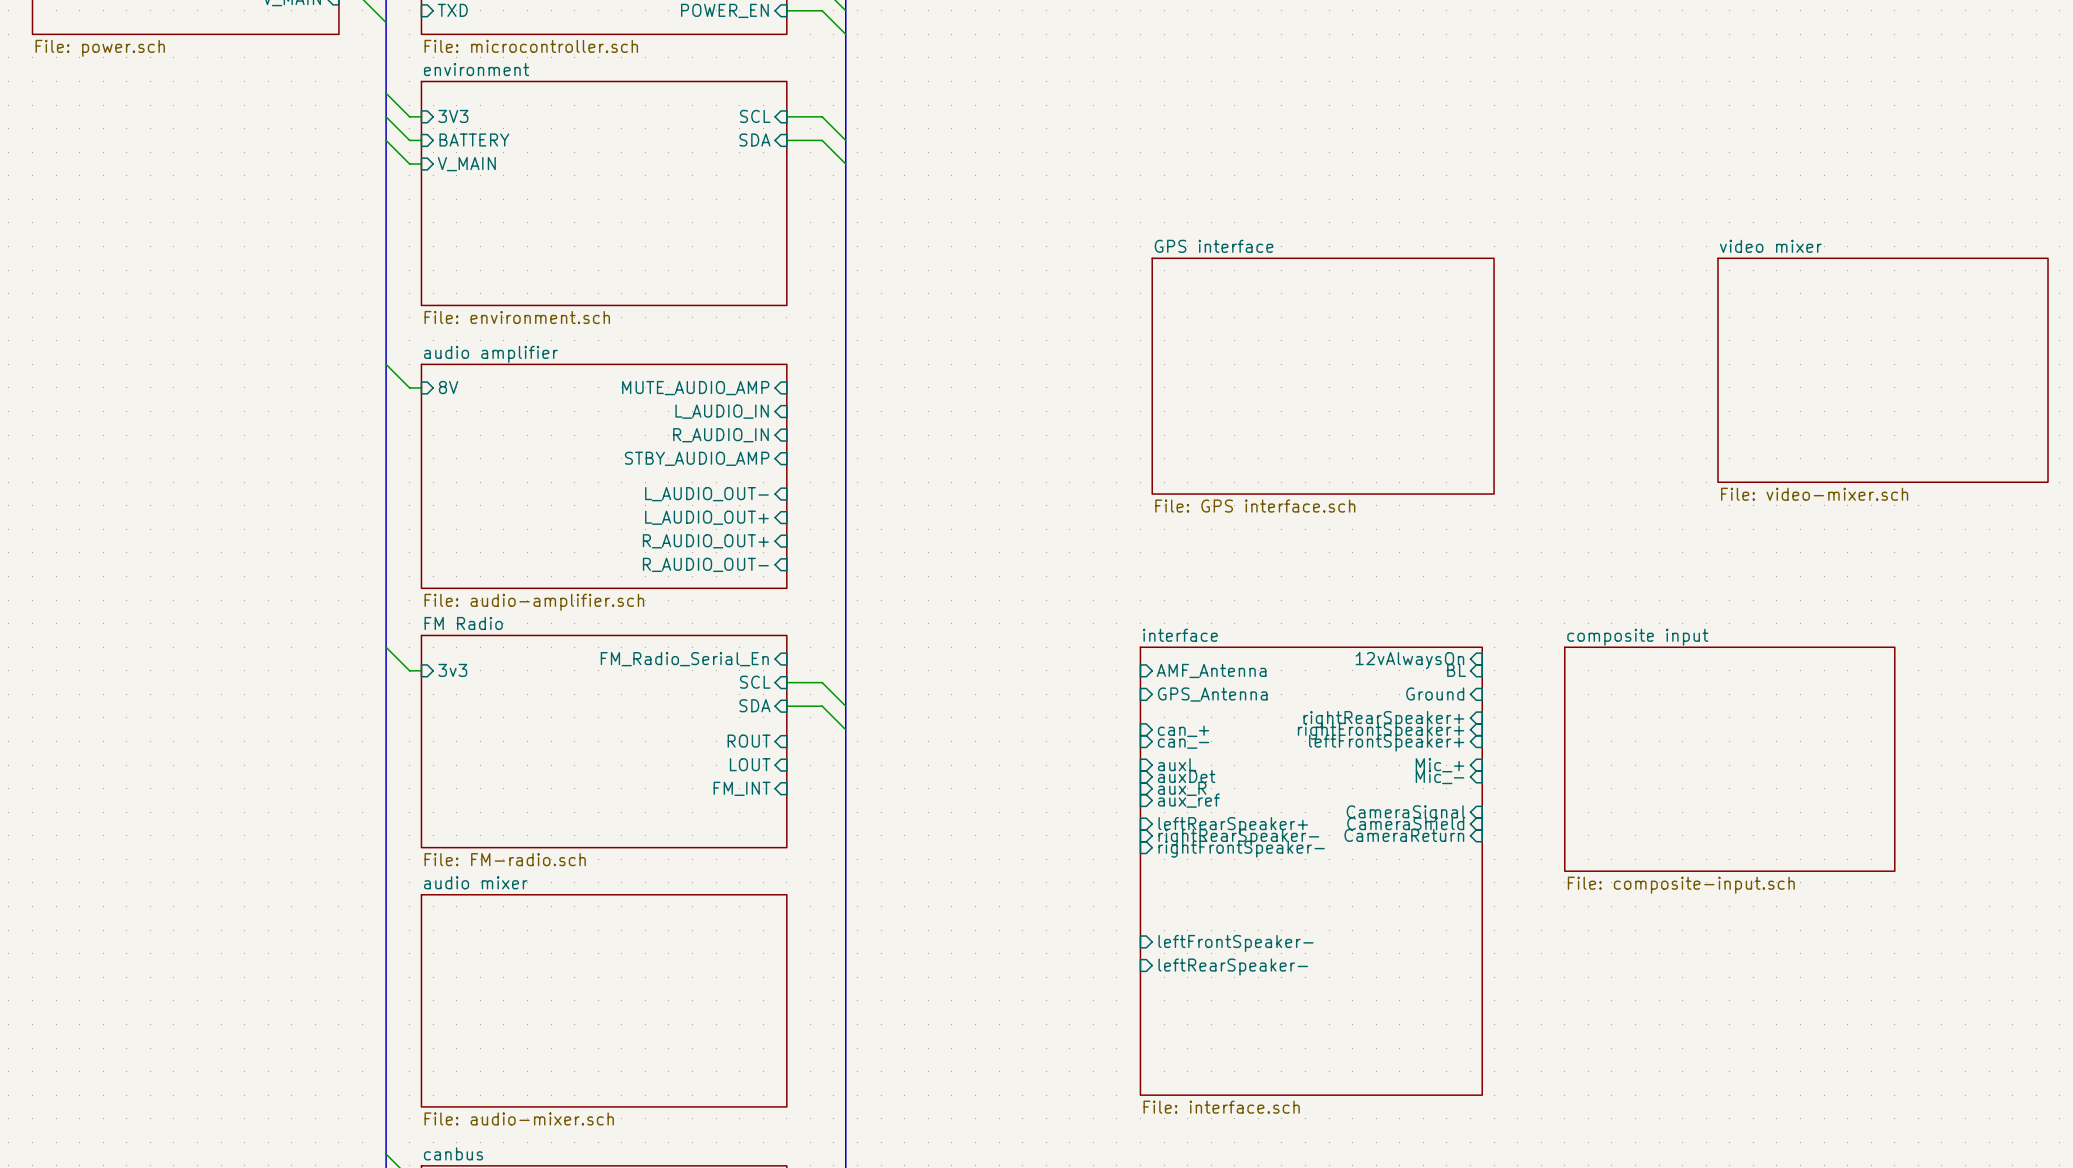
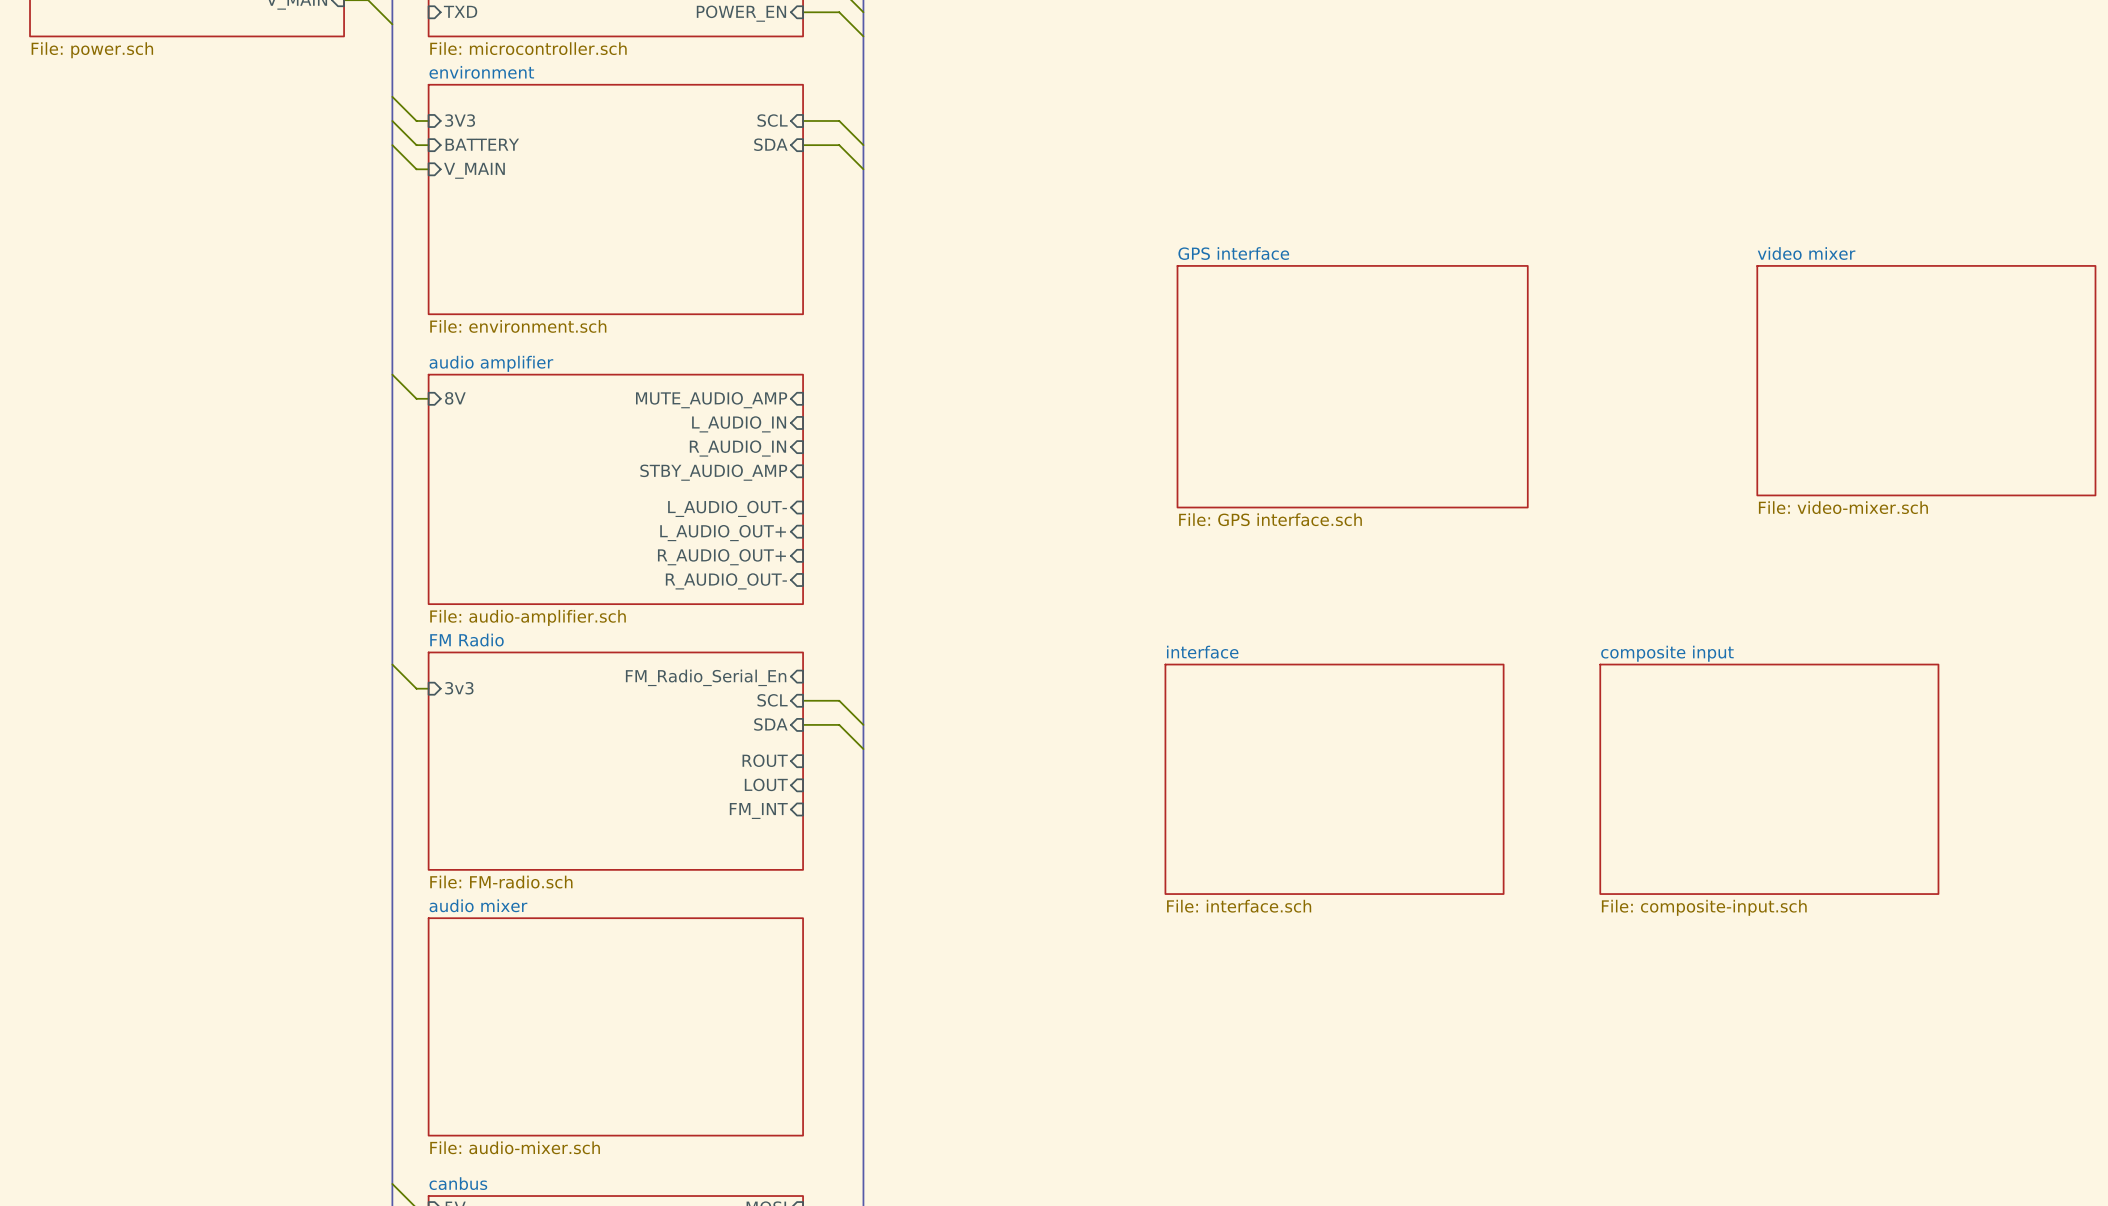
sheet pin: 12vAlwaysOn (1409, 660) -> none
sheet pin: AMF_Antenna (1211, 670) -> none
sheet pin: BL (1456, 670) -> none
sheet pin: Ground (1435, 693) -> none
sheet pin: GPS_Antenna (1212, 694) -> none
sheet pin: rightRearSpeaker+ (1383, 719) -> none
sheet pin: can_+ (1183, 731) -> none
sheet pin: rightFrontSpeaker+ (1381, 731) -> none
sheet pin: can_- (1183, 743) -> none
sheet pin: leftFrontSpeaker+ (1386, 743) -> none
sheet interface: none -> File: interface.sch (1334, 779)
sheet pin: auxL (1177, 764) -> none
sheet pin: Mic_+ (1439, 765) -> none
sheet pin: auxDet (1186, 776) -> none
sheet pin: Mic_- (1439, 777) -> none
sheet pin: aux_R (1182, 788) -> none
sheet pin: aux_ref (1188, 800) -> none
sheet pin: CameraSignal (1406, 813) -> none
sheet pin: CameraShield (1405, 823) -> none
sheet pin: leftRearSpeaker+ (1233, 825) -> none
sheet pin: CameraReturn (1404, 835) -> none
sheet pin: rightRearSpeaker- (1238, 837) -> none
sheet pin: rightFrontSpeaker- (1241, 849) -> none
sheet interface: File: interface.sch (1311, 871) -> none
sheet pin: leftFrontSpeaker- (1236, 943) -> none
sheet pin: leftRearSpeaker- (1233, 967) -> none

